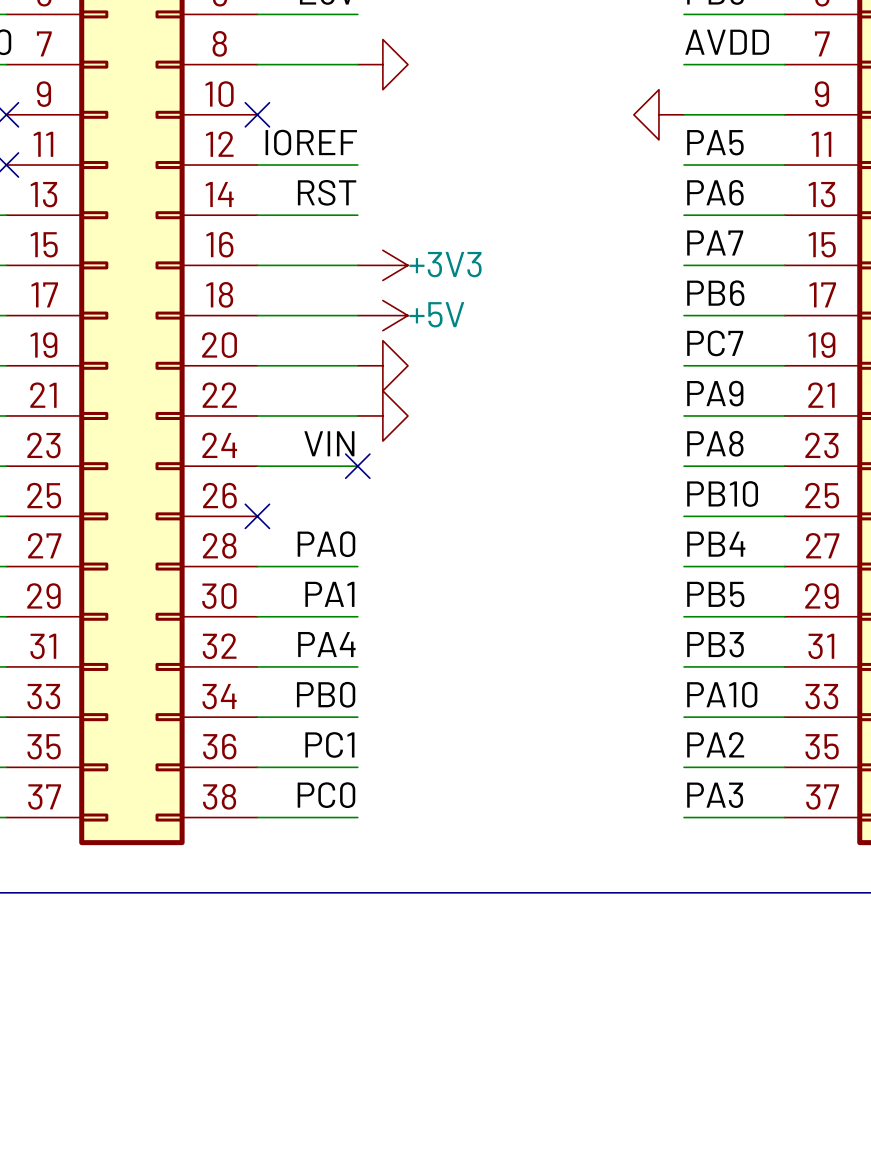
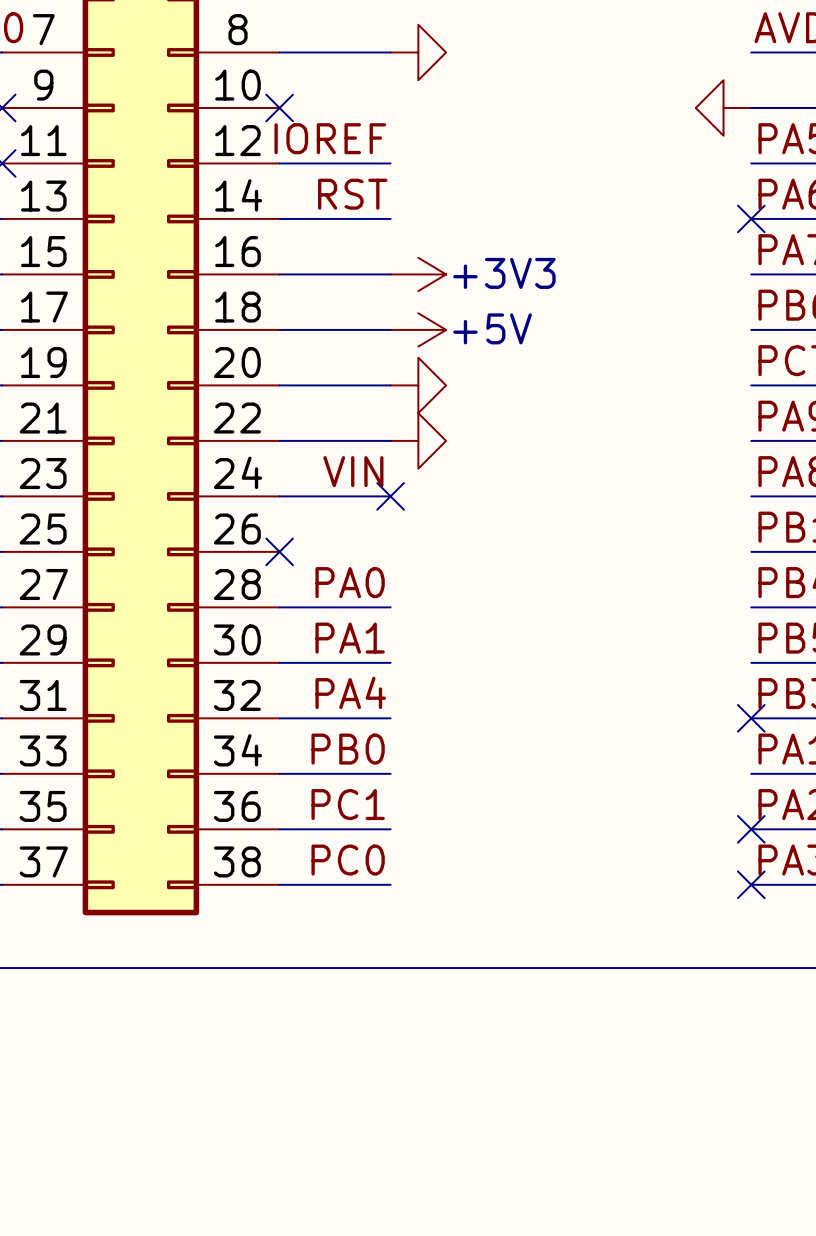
no-connect mark: none -> (751, 218)
no-connect mark: none -> (751, 718)
no-connect mark: none -> (751, 829)
no-connect mark: none -> (751, 884)

